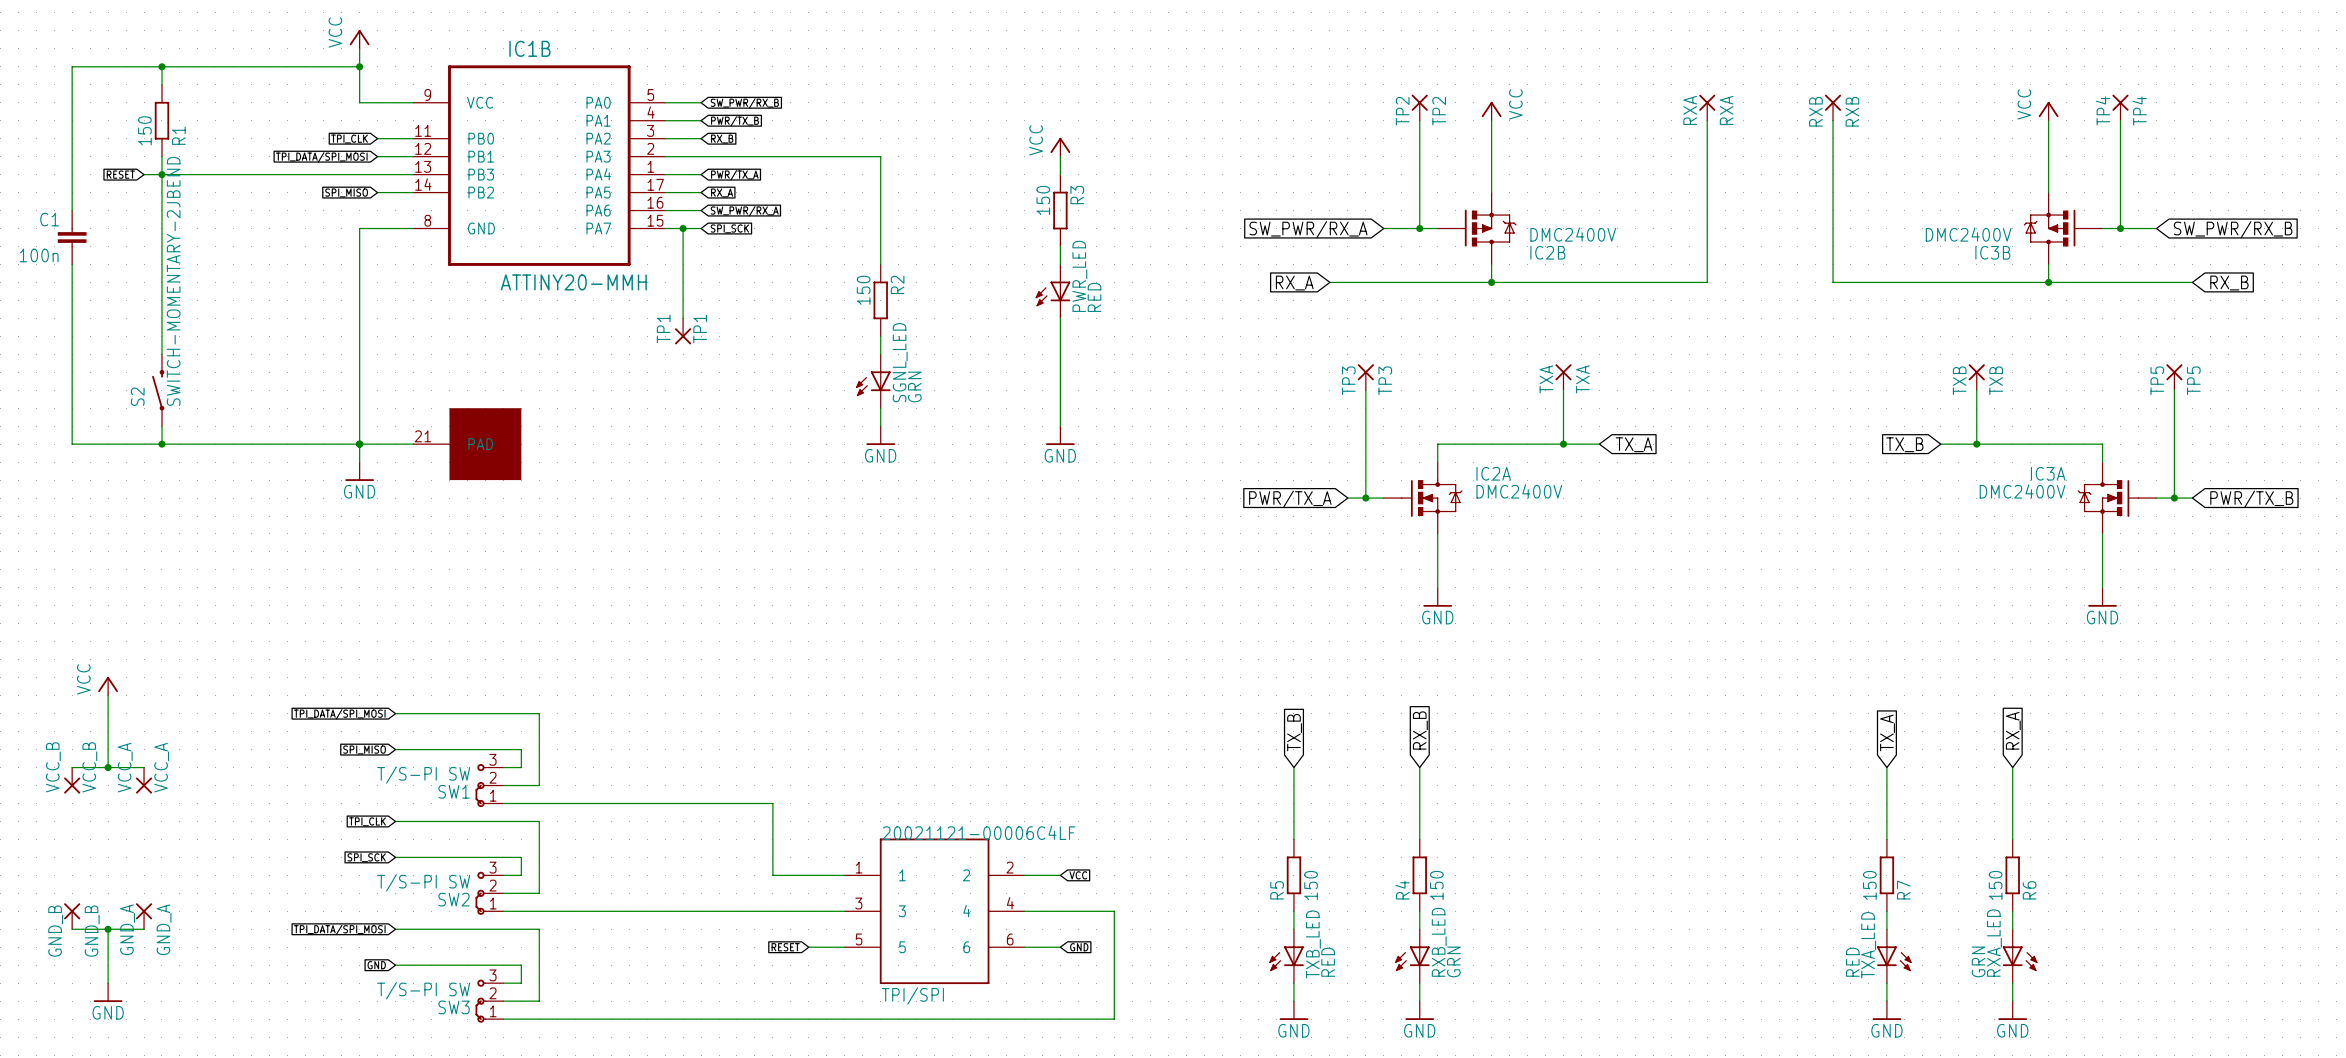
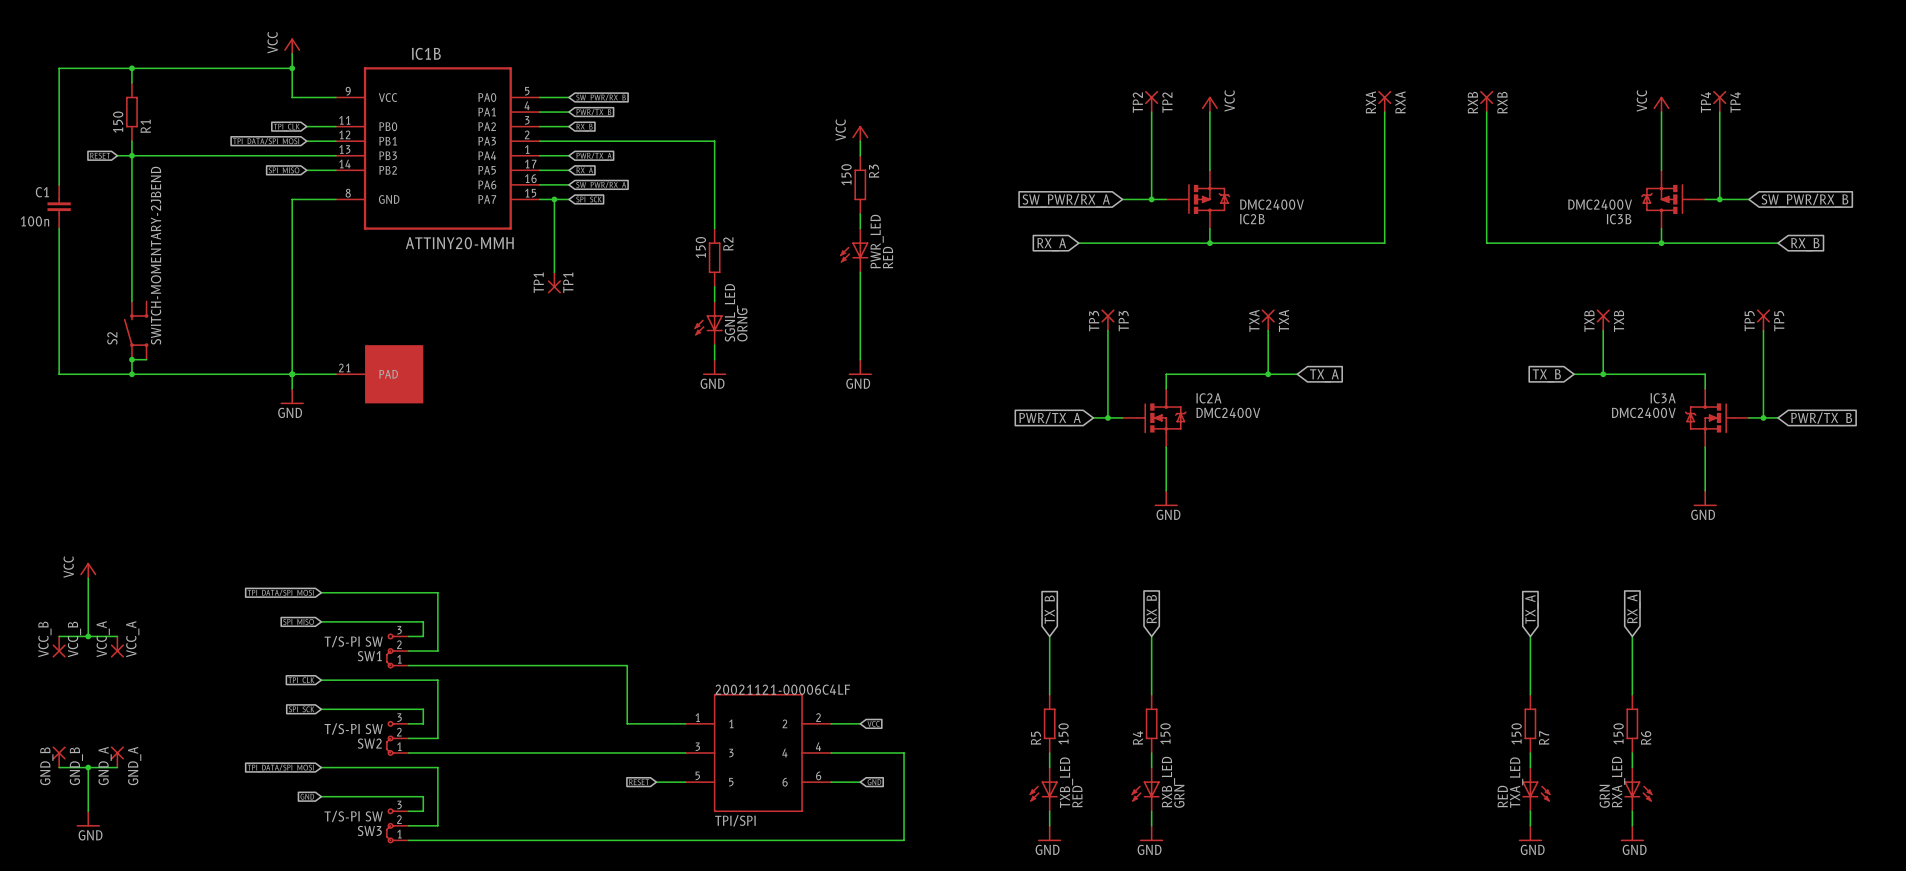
S2 symbol: [152, 354, 165, 427] -> [123, 301, 149, 360]
SGNL_LED value: GRN (914, 386) -> ORNG (742, 324)
wire: none -> (131, 359) (146, 359)
junction: none -> (131, 359)

